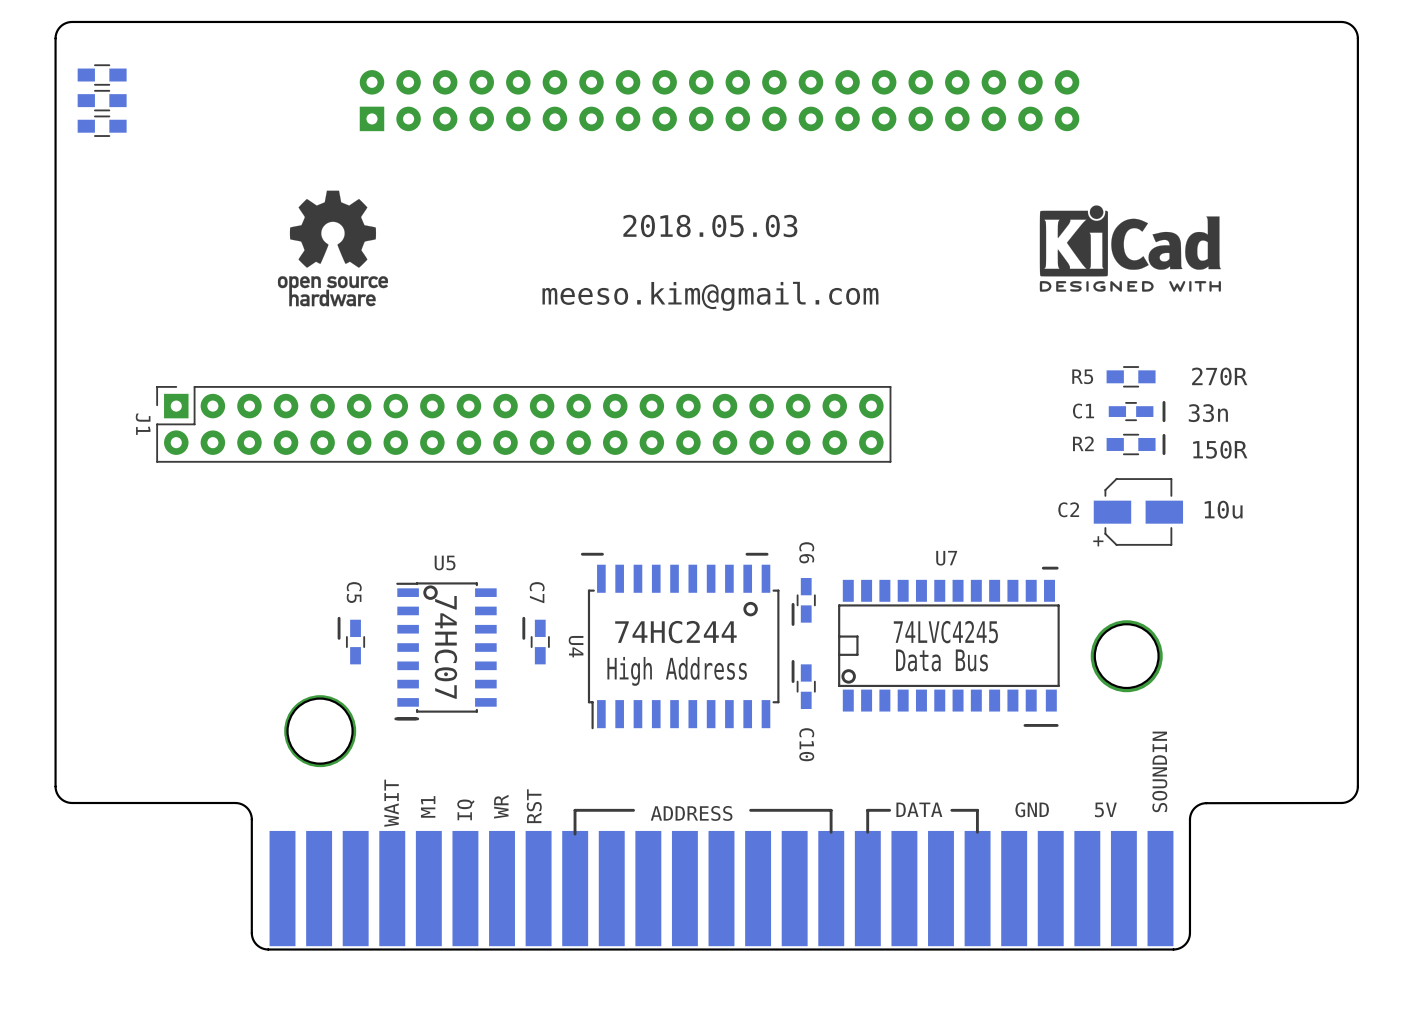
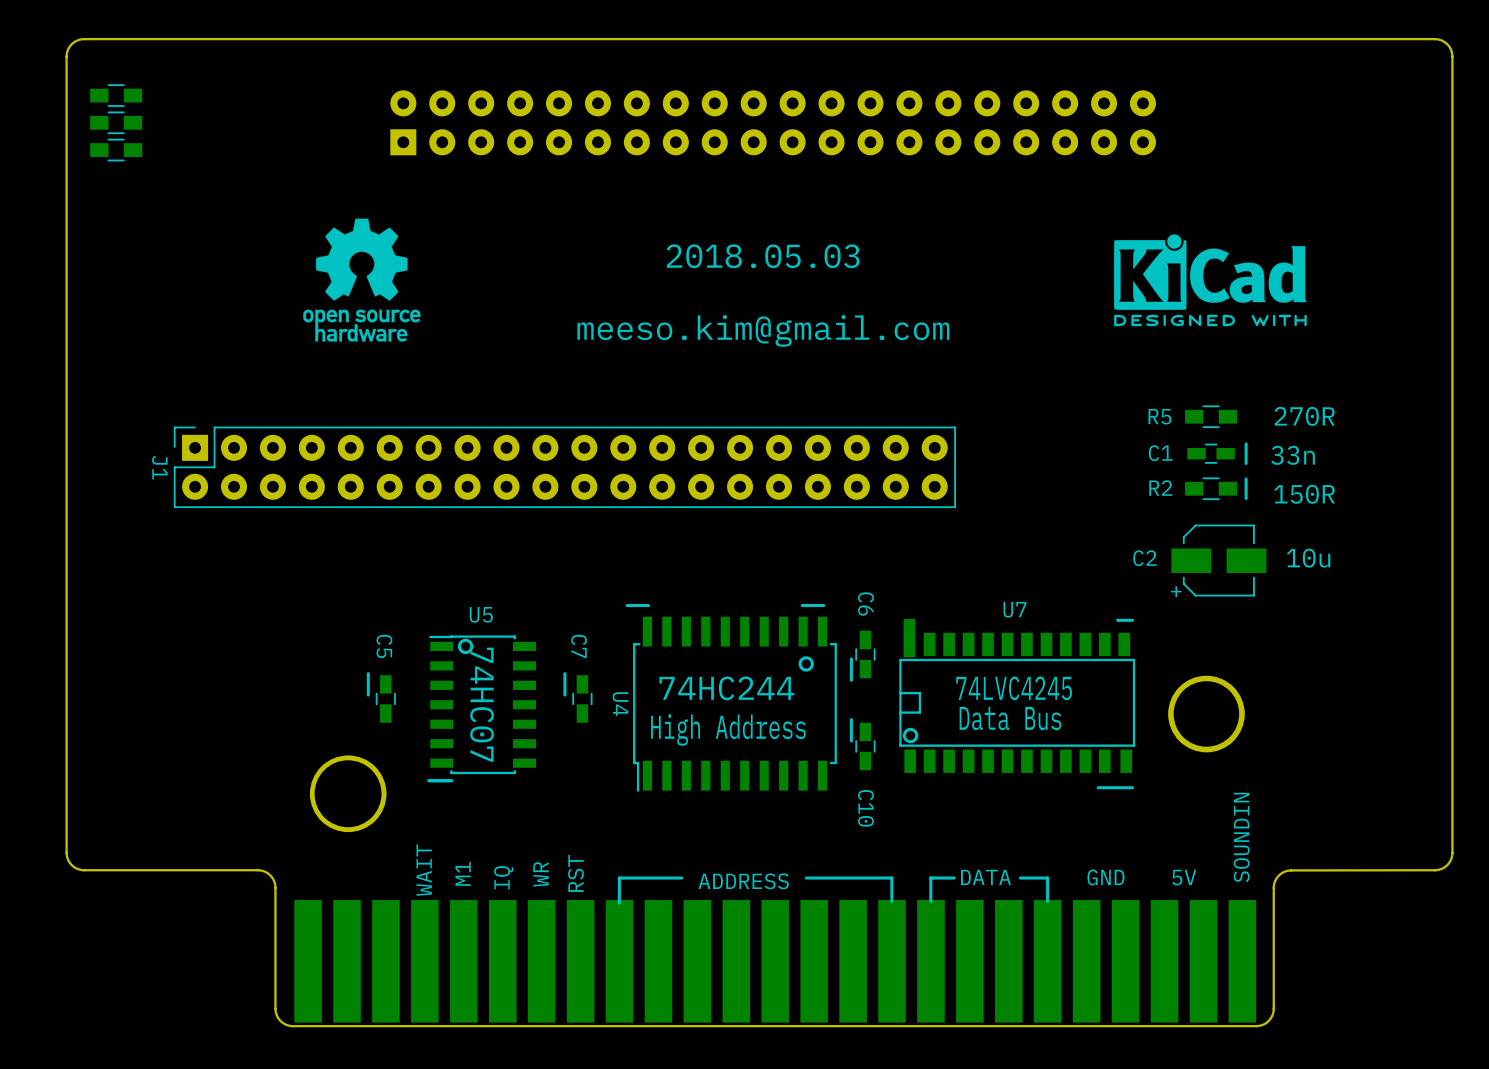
U7 footprint: [838, 579, 1060, 712] -> [899, 618, 1136, 773]

